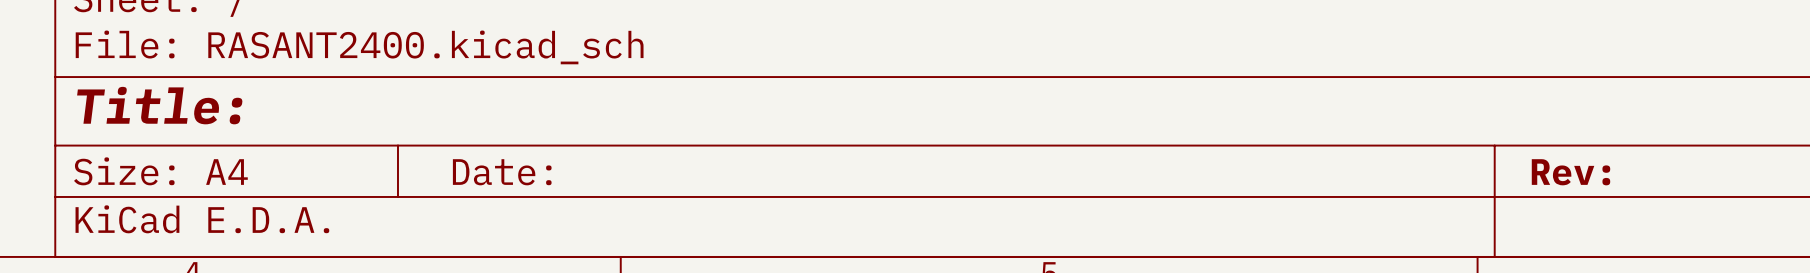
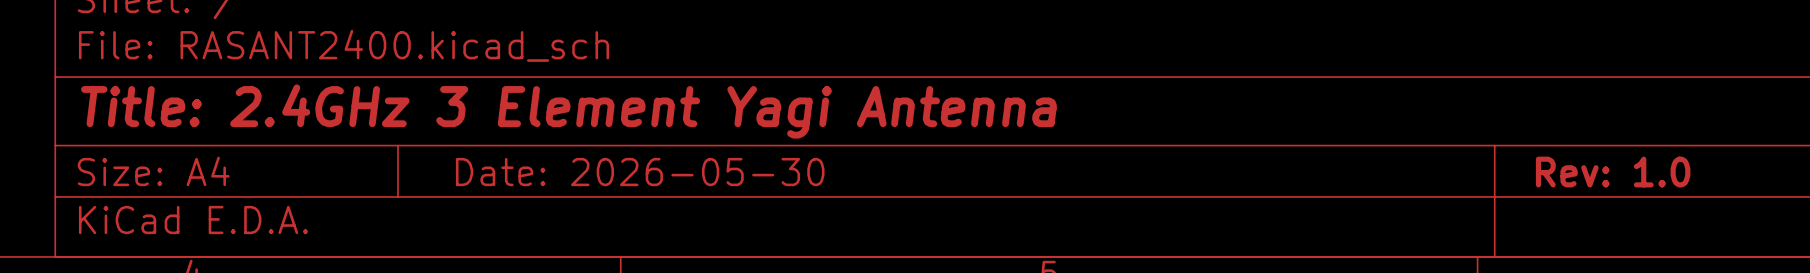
title block: Title: (159, 105) -> Title: 2.4GHz 3 Element Yagi Antenna (568, 111)
title block: Date: (502, 172) -> Date: 2026-05-30 (640, 172)
title block: Rev: (1570, 172) -> Rev: 1.0 (1613, 172)

